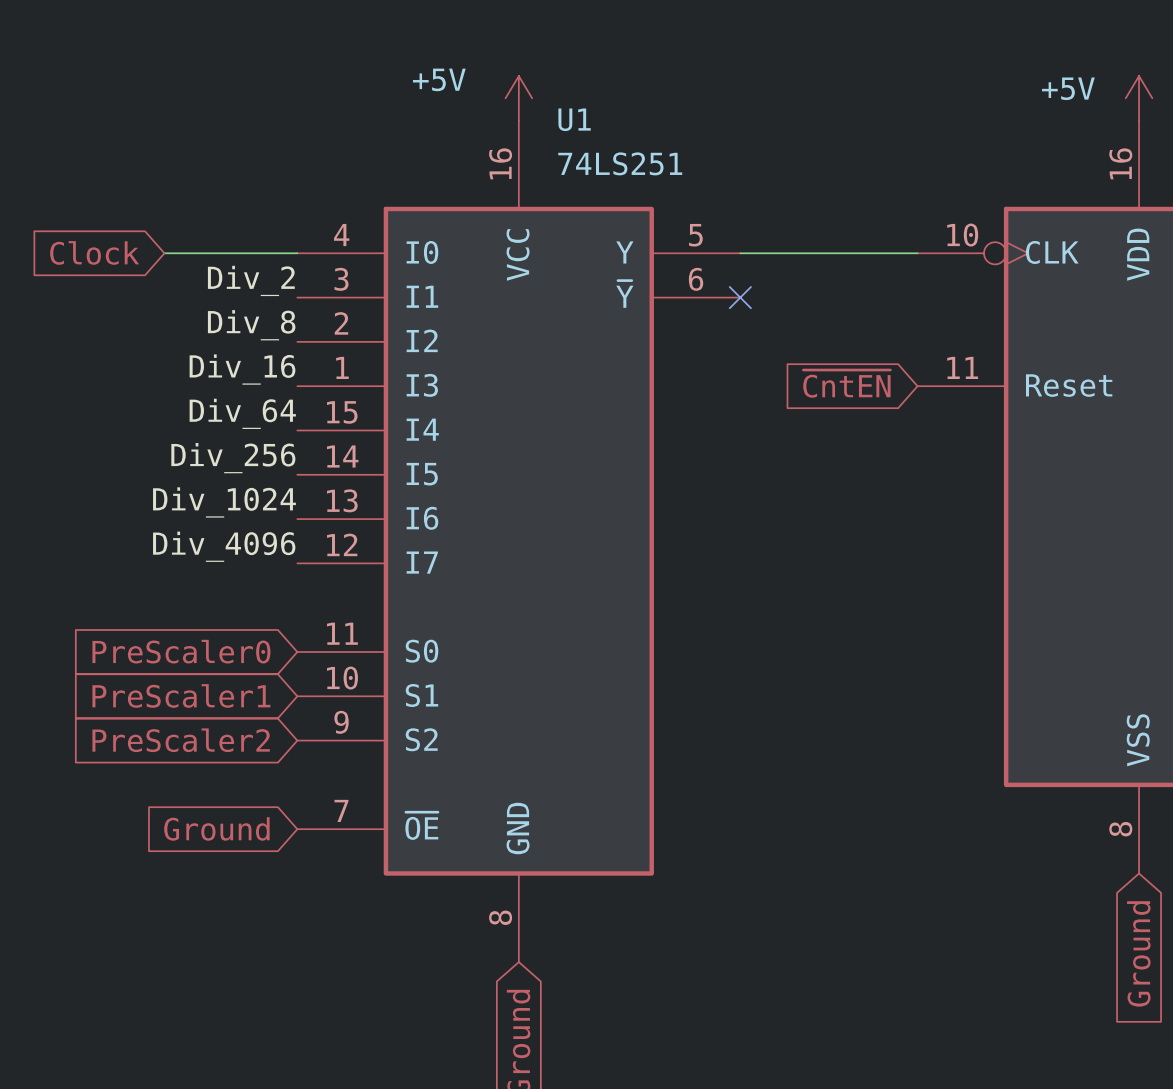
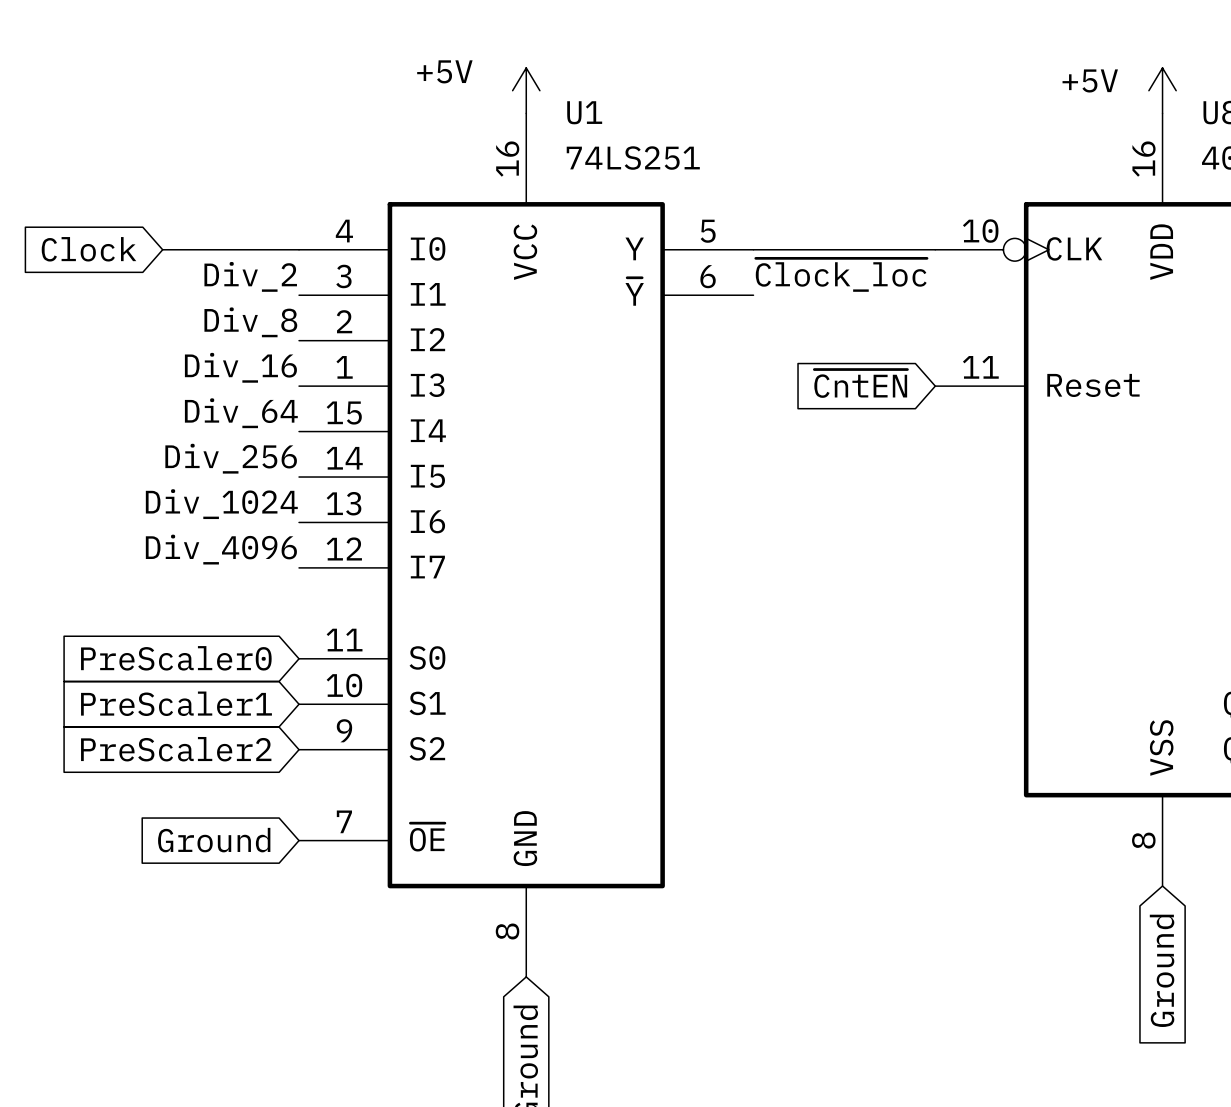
label: none -> ~{Clock_loc} (841, 275)
no-connect mark: (740, 297) -> none

